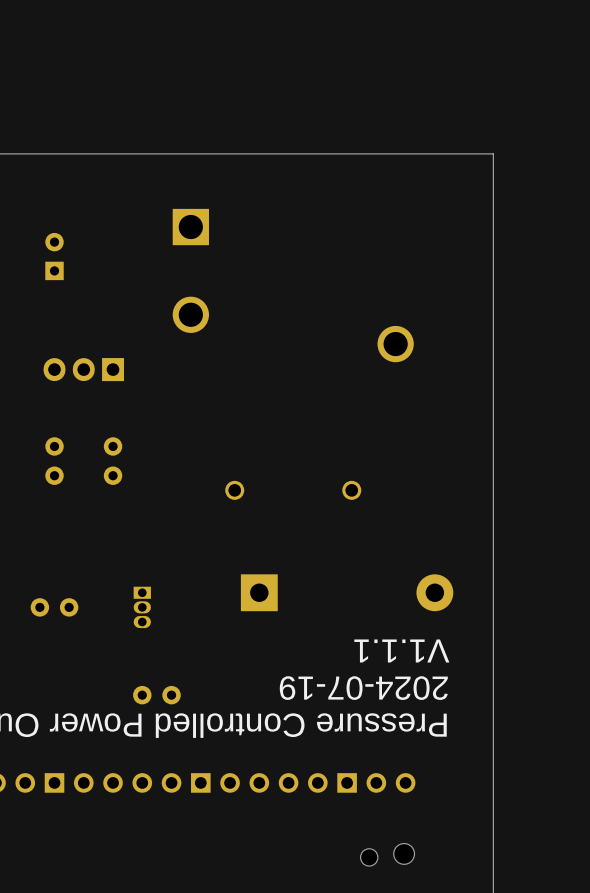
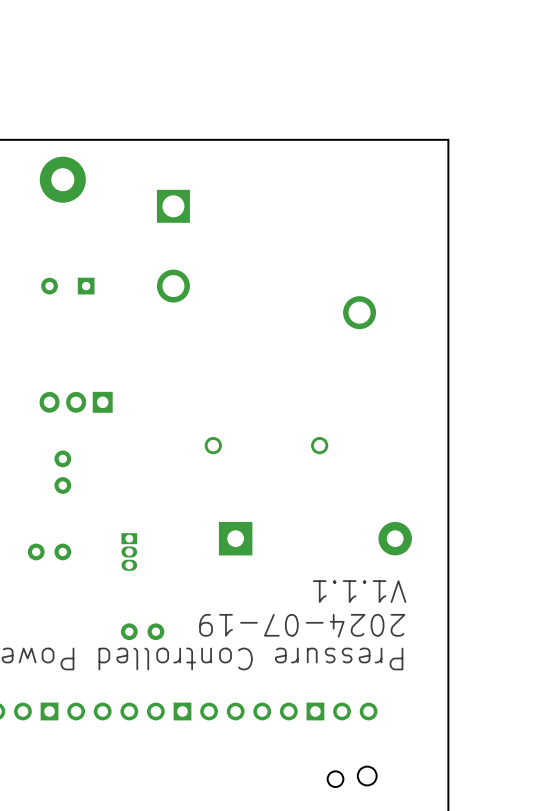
part: none -> (62, 179)
part: (54, 256) -> none
part: none -> (67, 286)
part position: (83, 369) -> (76, 402)
part: (54, 461) -> none
part: (113, 461) -> none
part: none -> (62, 472)

